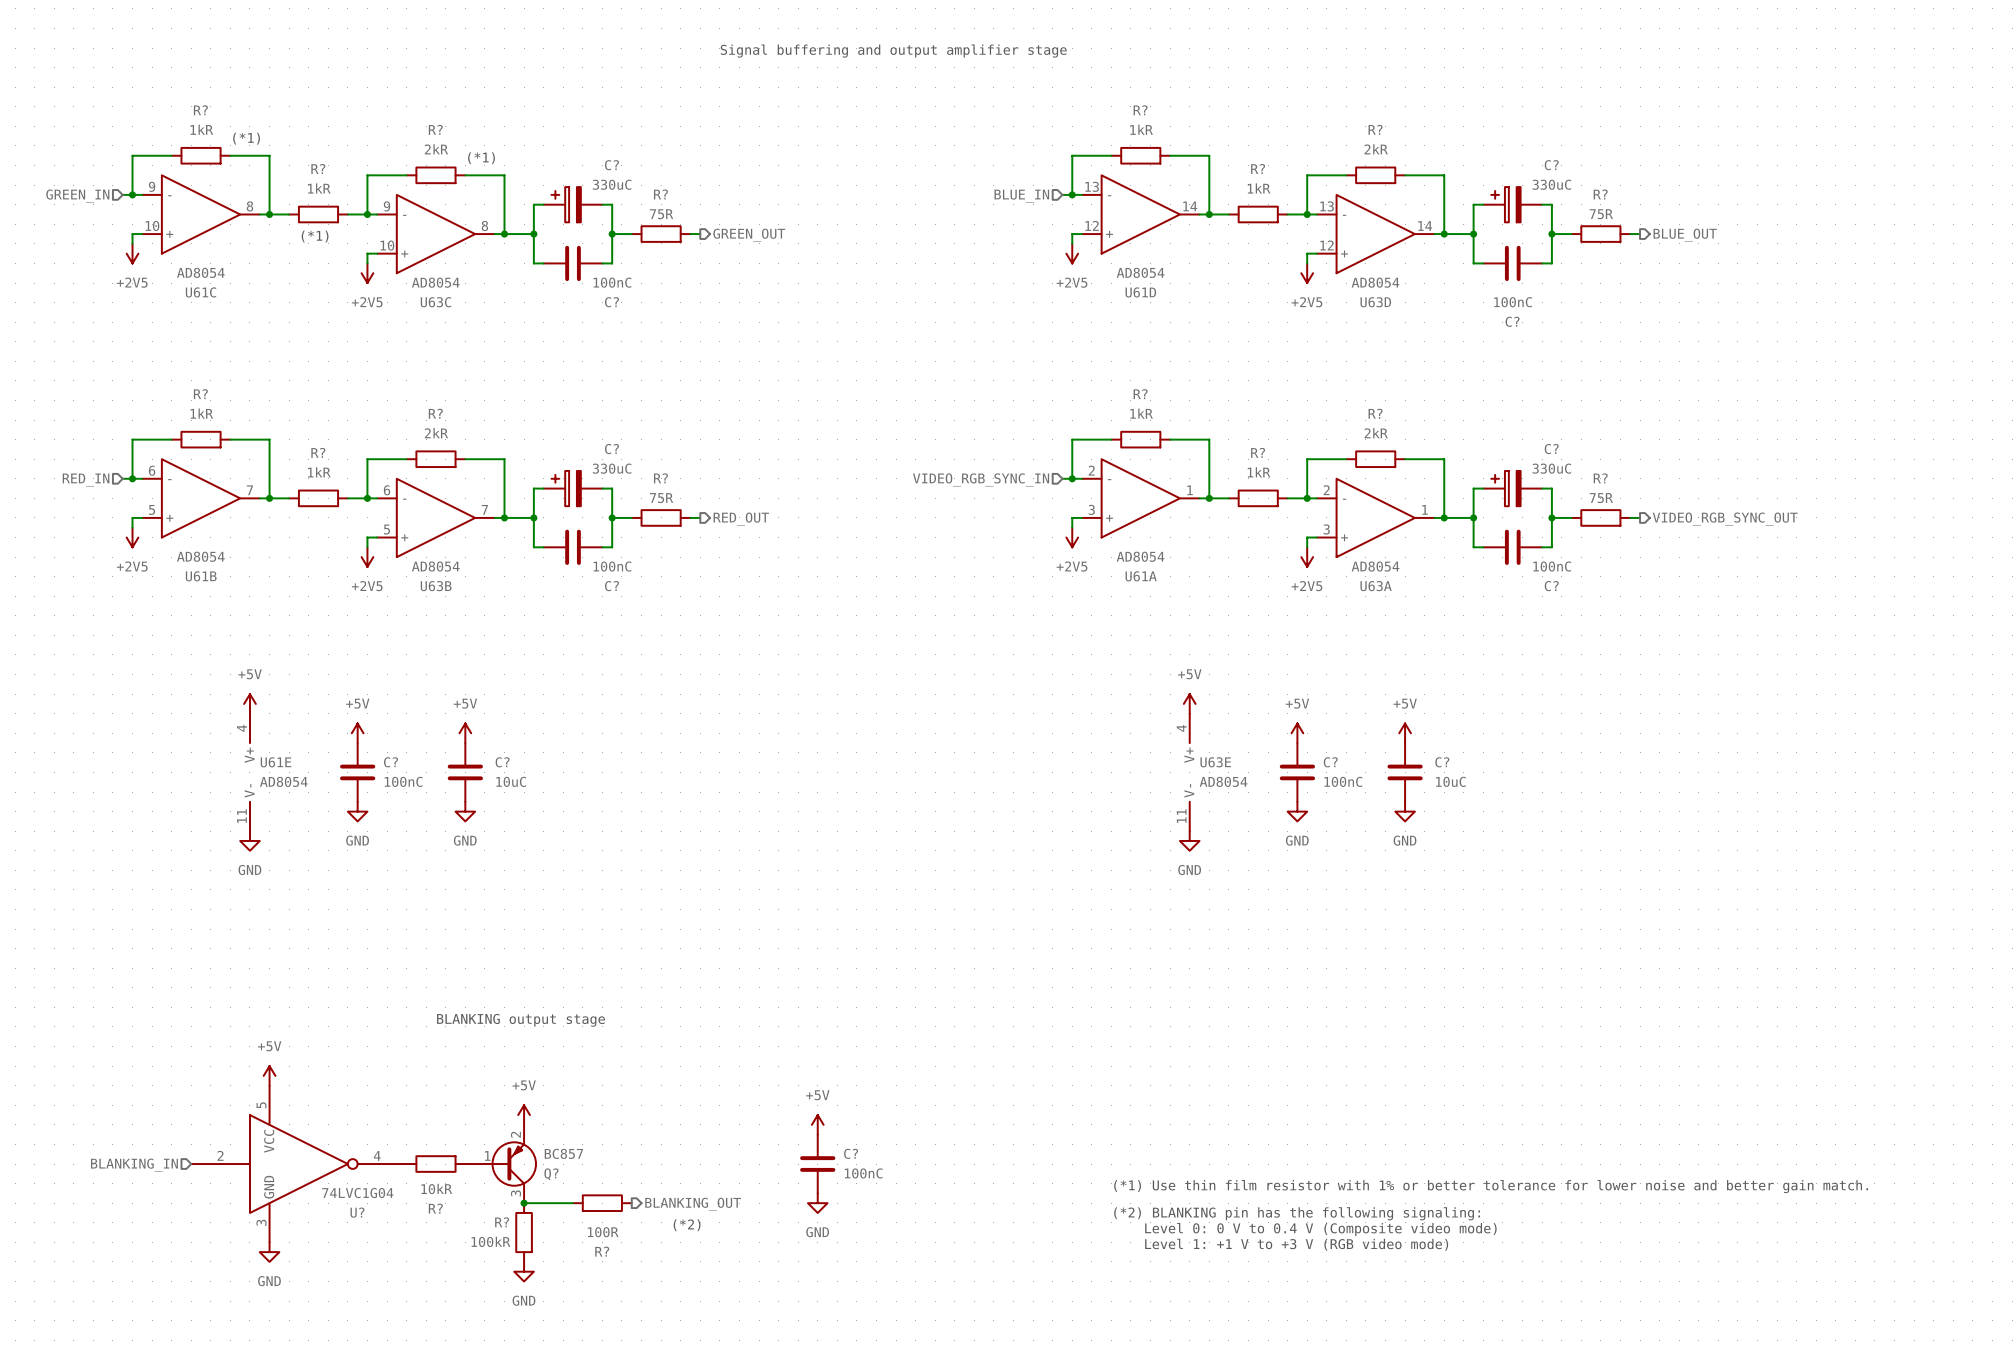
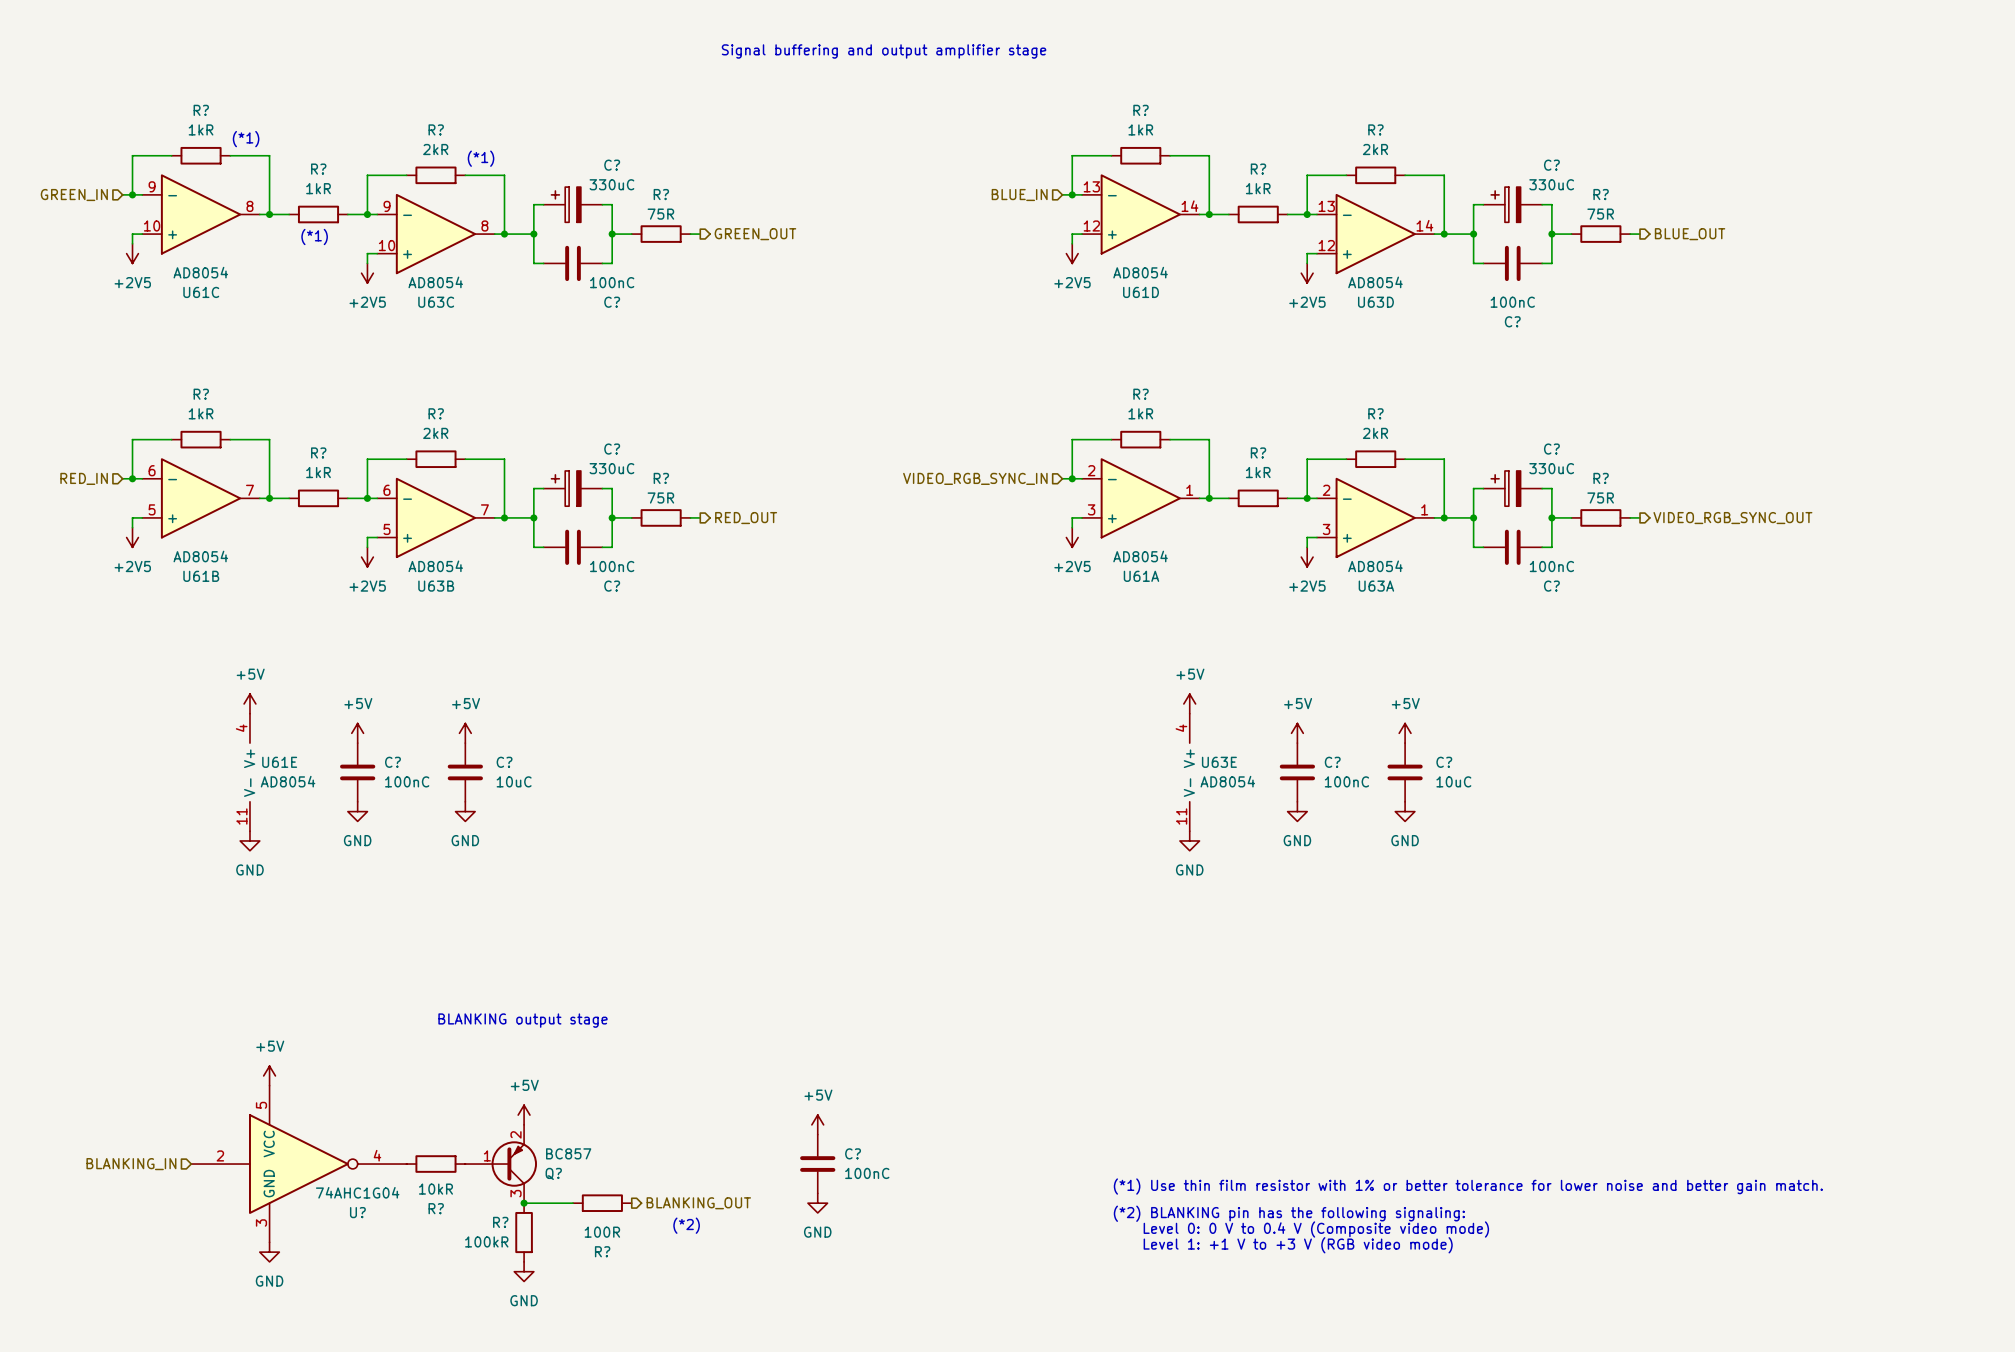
U? value: 74LVC1G04 (357, 1193) -> 74AHC1G04 (357, 1192)

